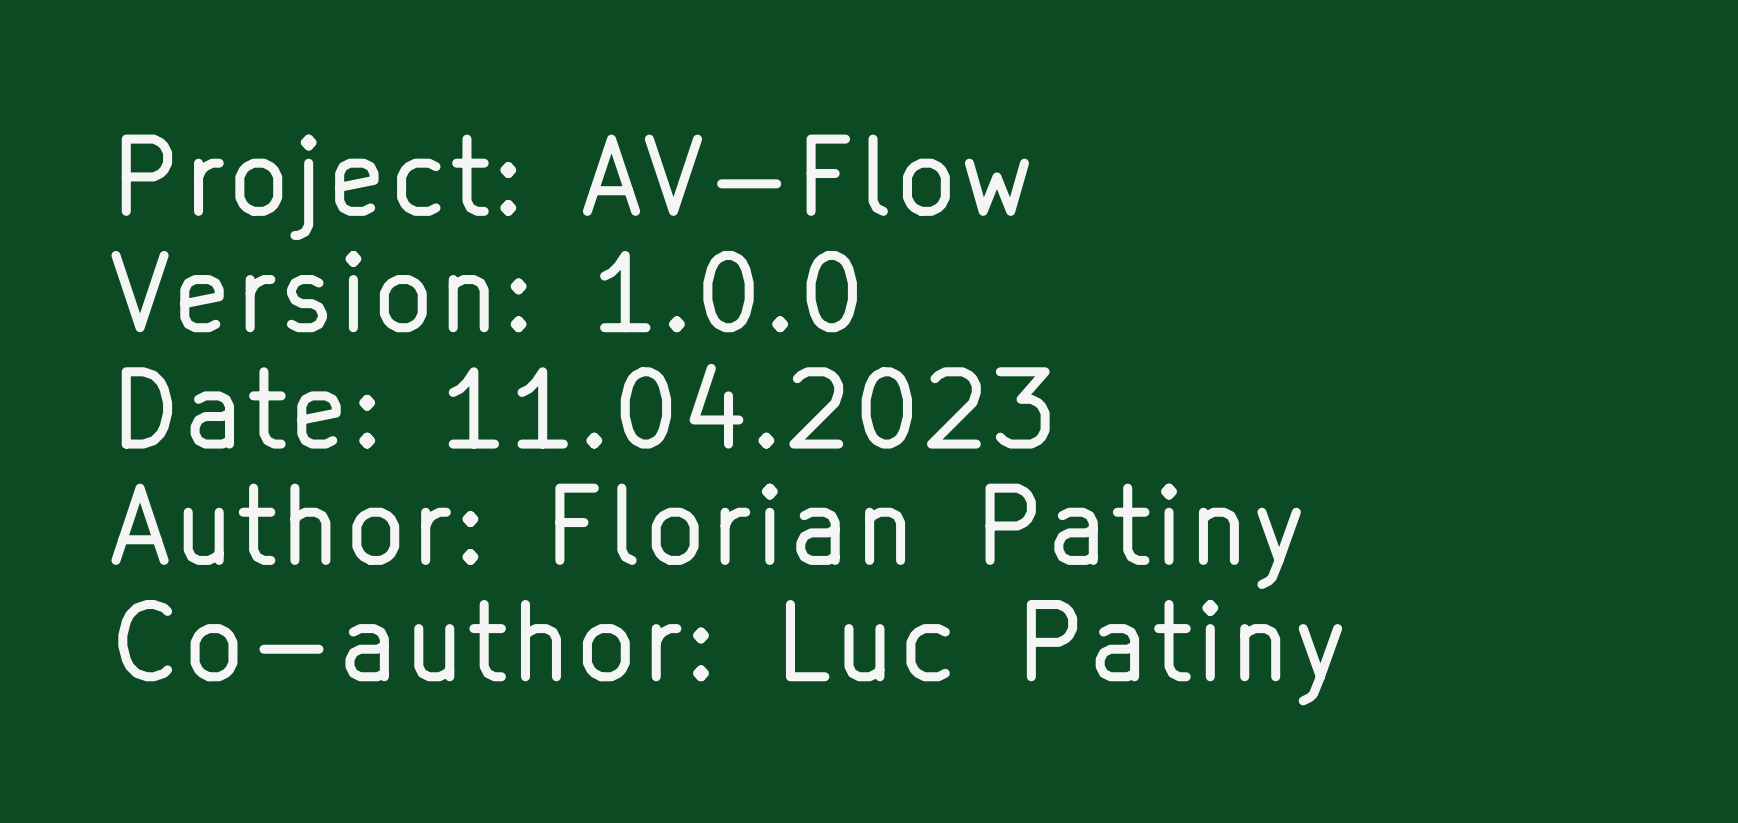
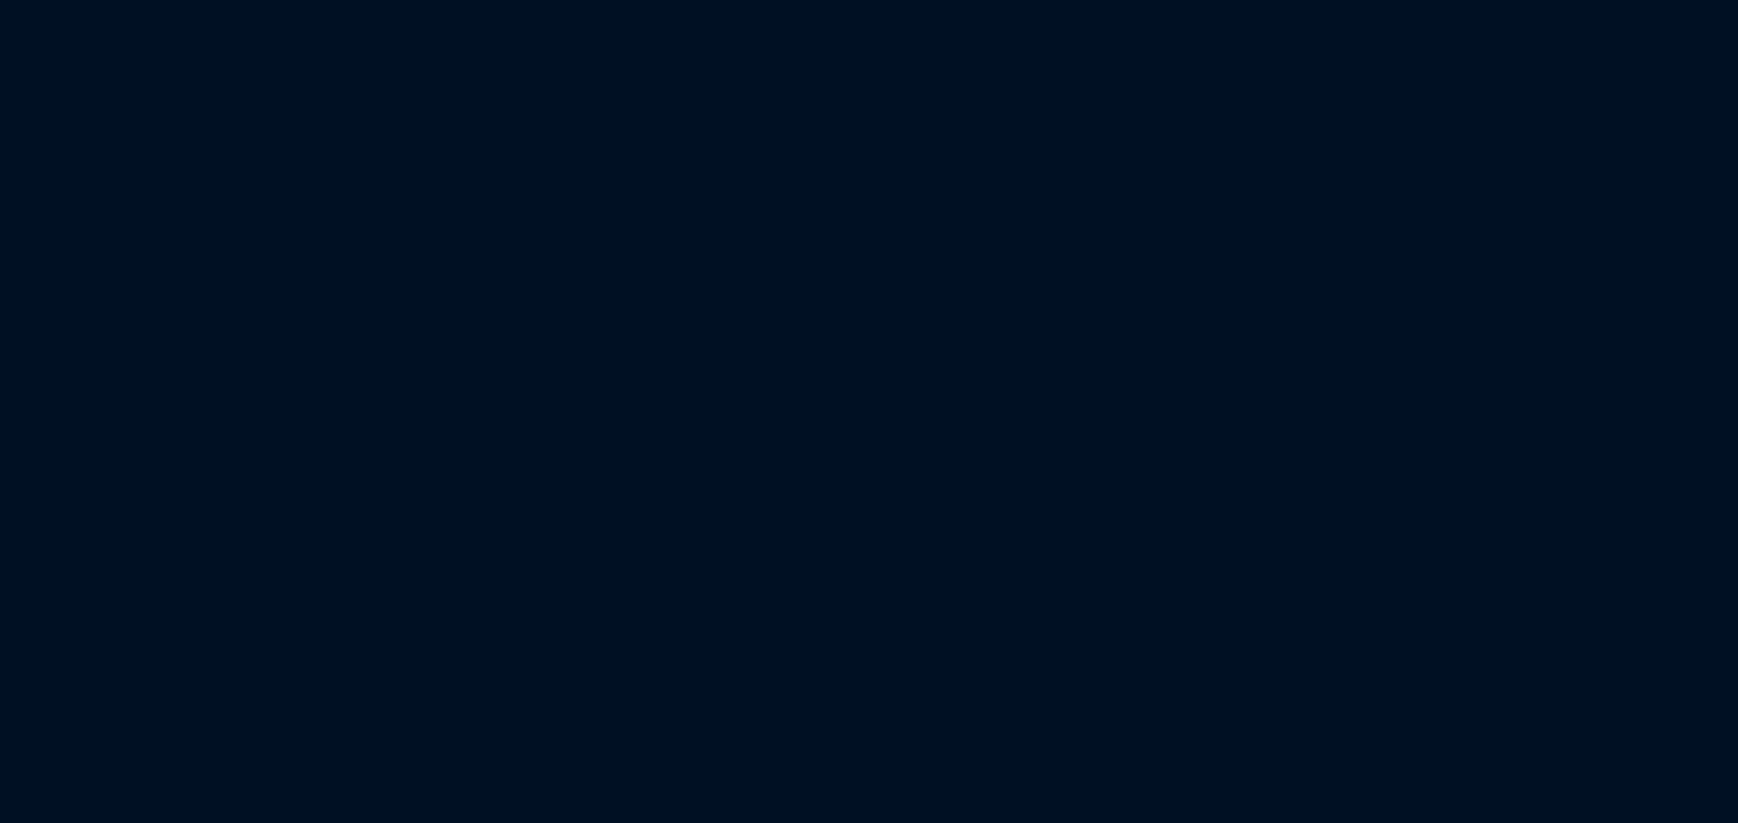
text: Project: AV-Flow (575, 187) -> none
text: Version: 1.0.0 (484, 291) -> none
text: Date: 11.04.2023 (585, 406) -> none
text: Author: Florian Patiny (706, 536) -> none
text: Co-author: Luc Patiny (730, 652) -> none

